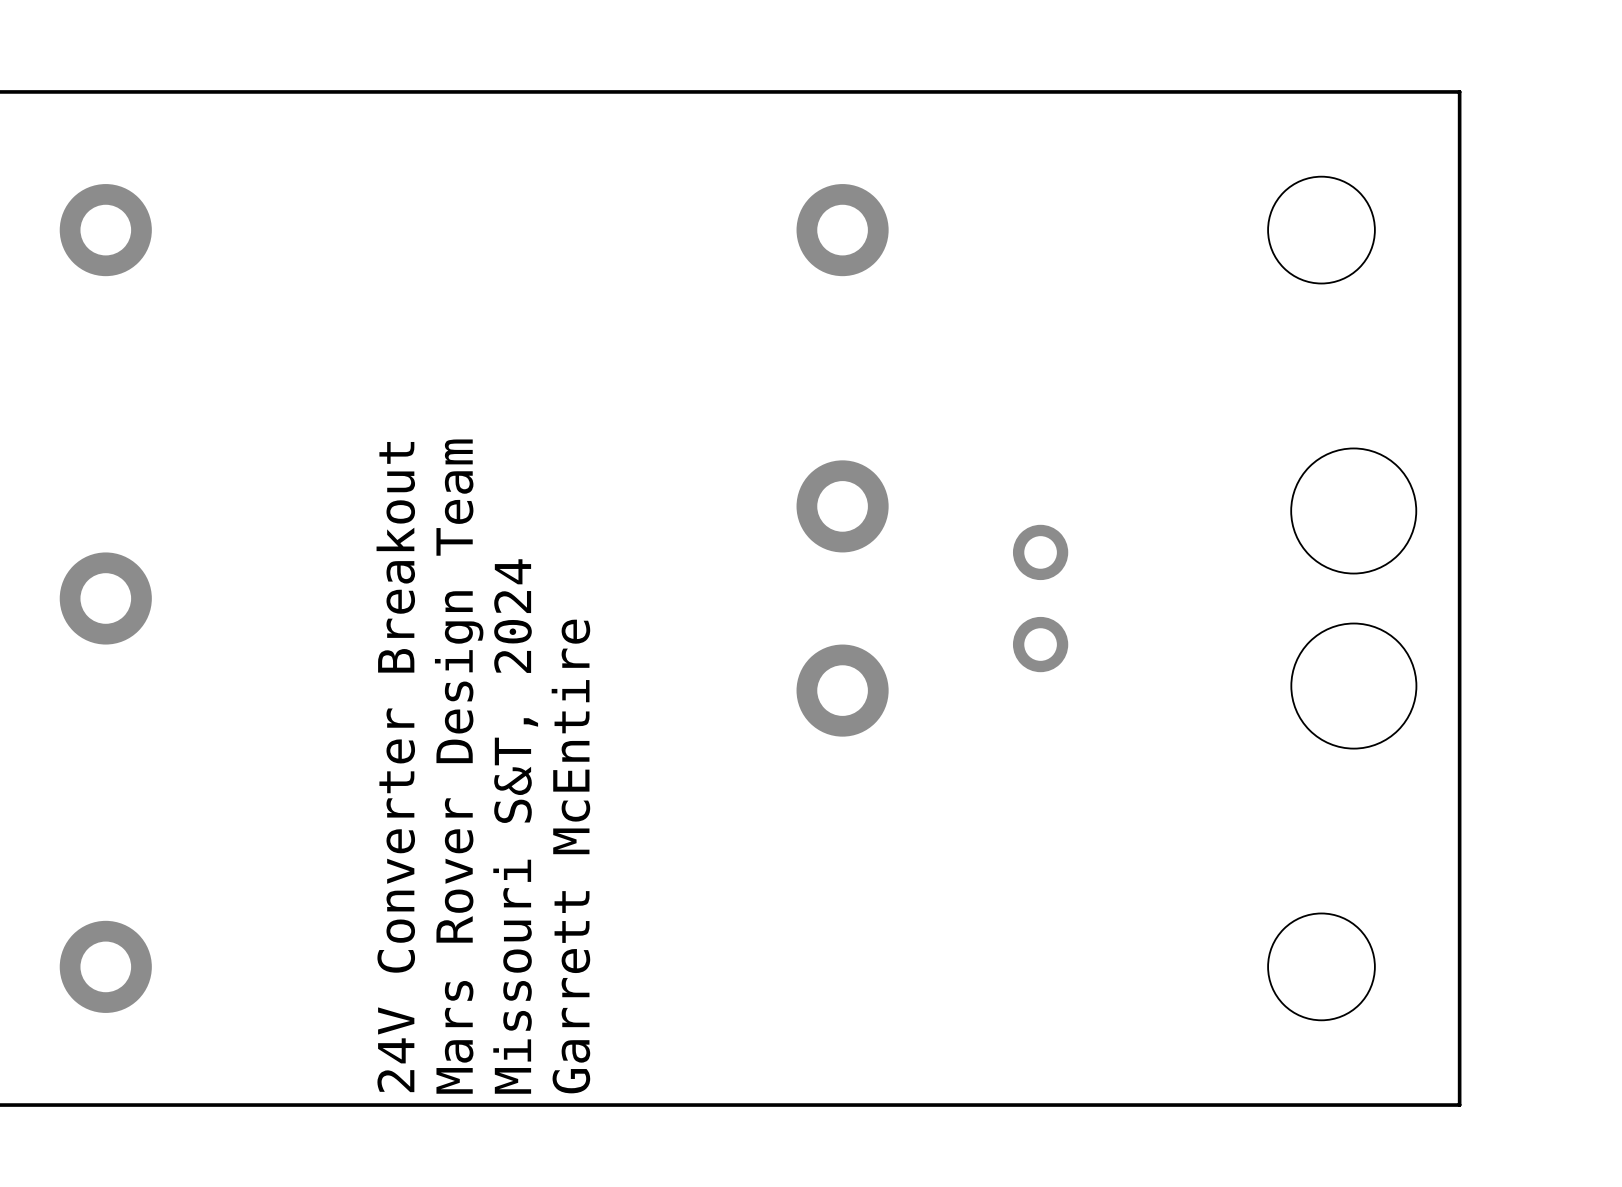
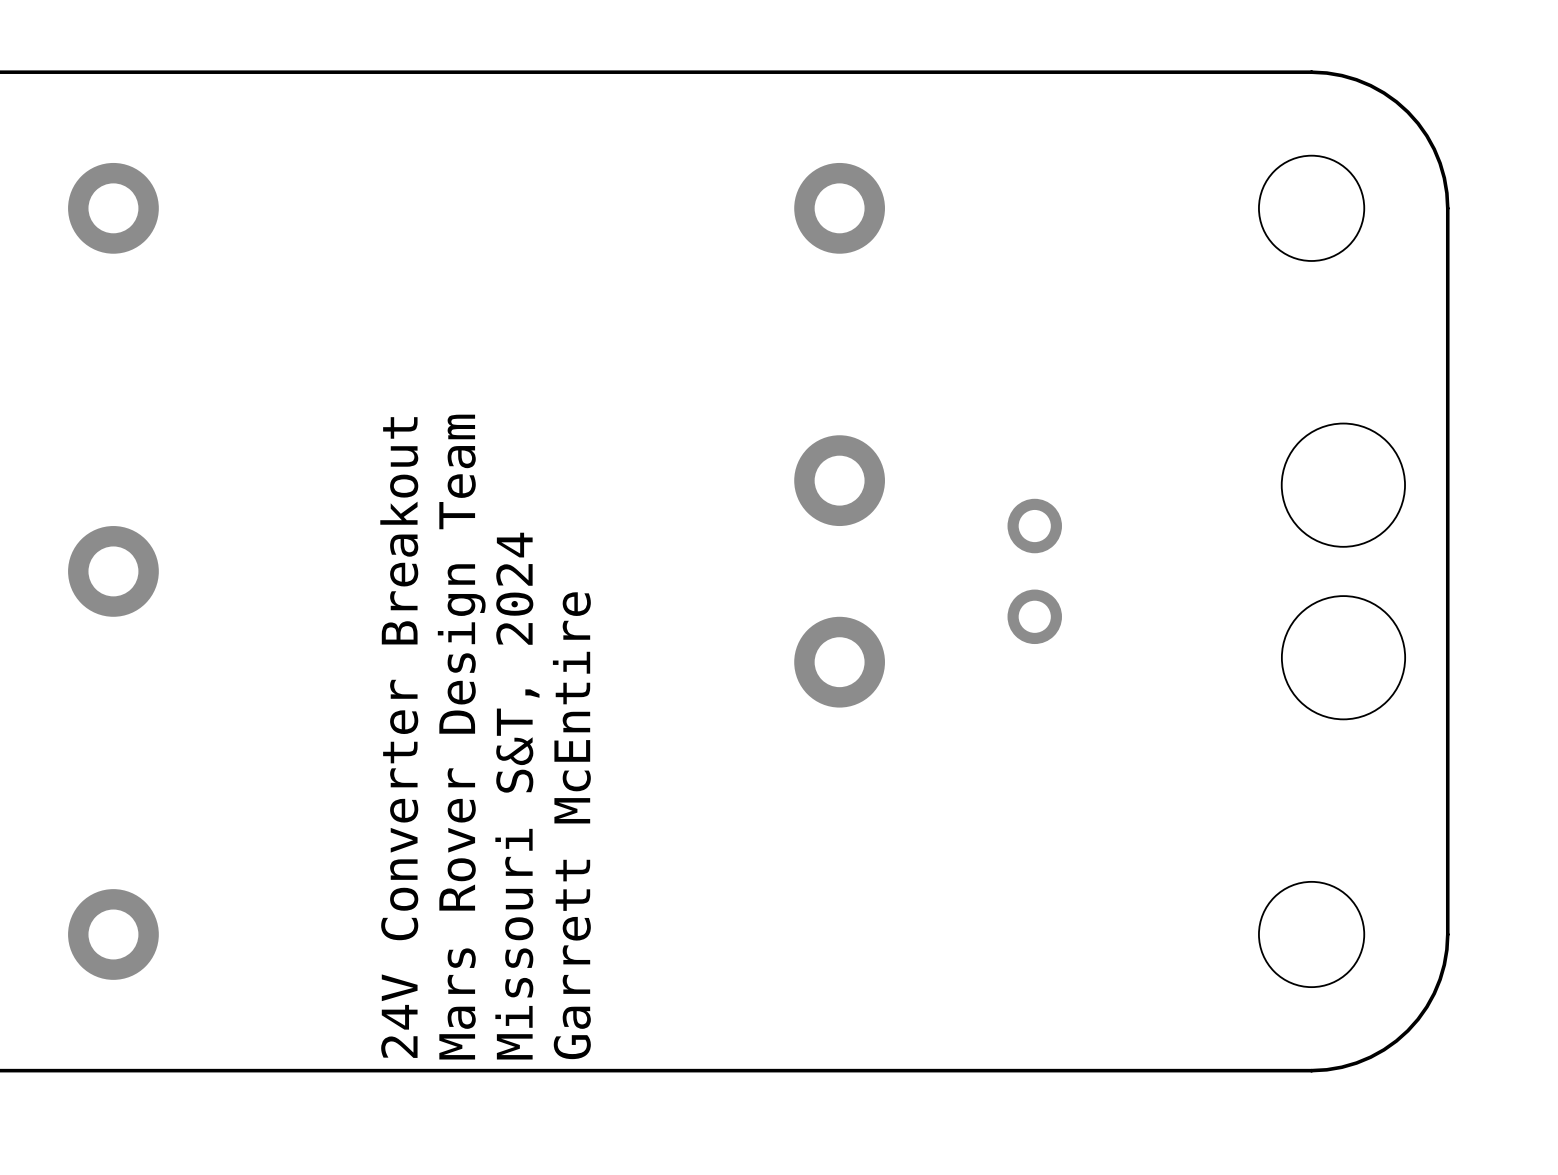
board edge: (1321, 91) (1459, 91) (1459, 230) -> (1311, 72) (1326, 73) (1356, 79) (1384, 93) (1407, 112) (1426, 135) (1440, 163) (1444, 178) (1447, 208)
board edge: (1459, 966) (1459, 1105) (1321, 1105) -> (1447, 934) (1444, 964) (1434, 993) (1418, 1019) (1407, 1030) (1396, 1040) (1370, 1057) (1341, 1067) (1311, 1070)

